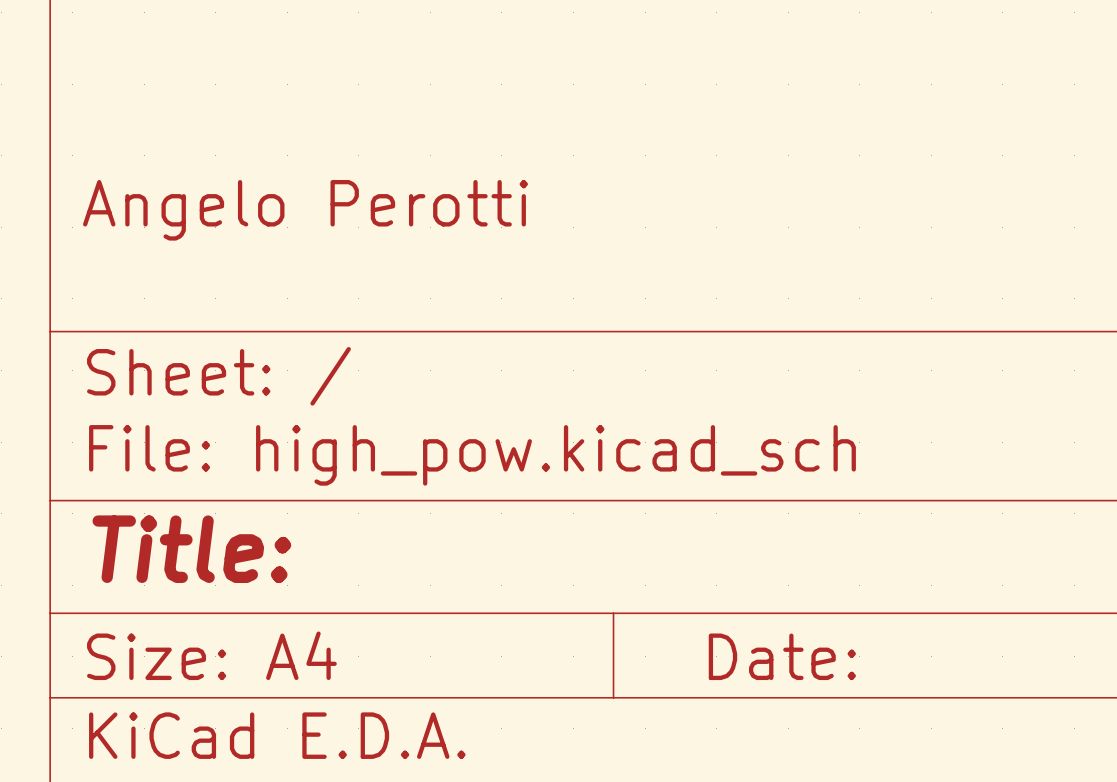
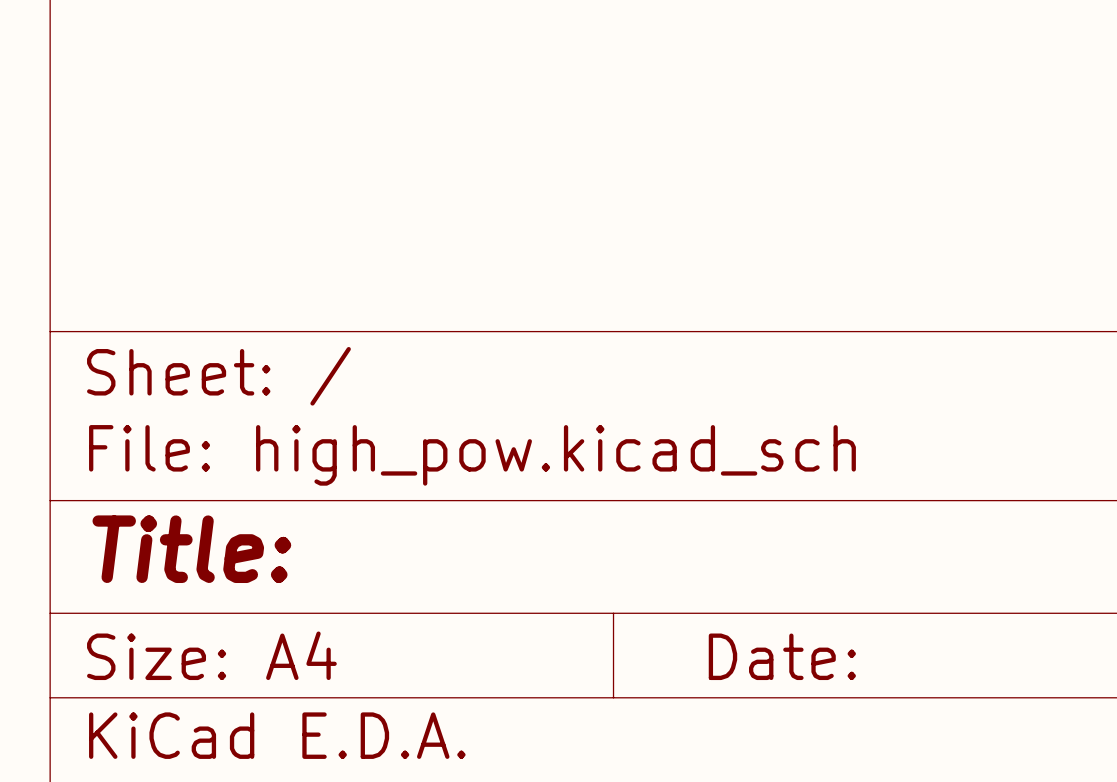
title block: Angelo Perotti (305, 210) -> none

